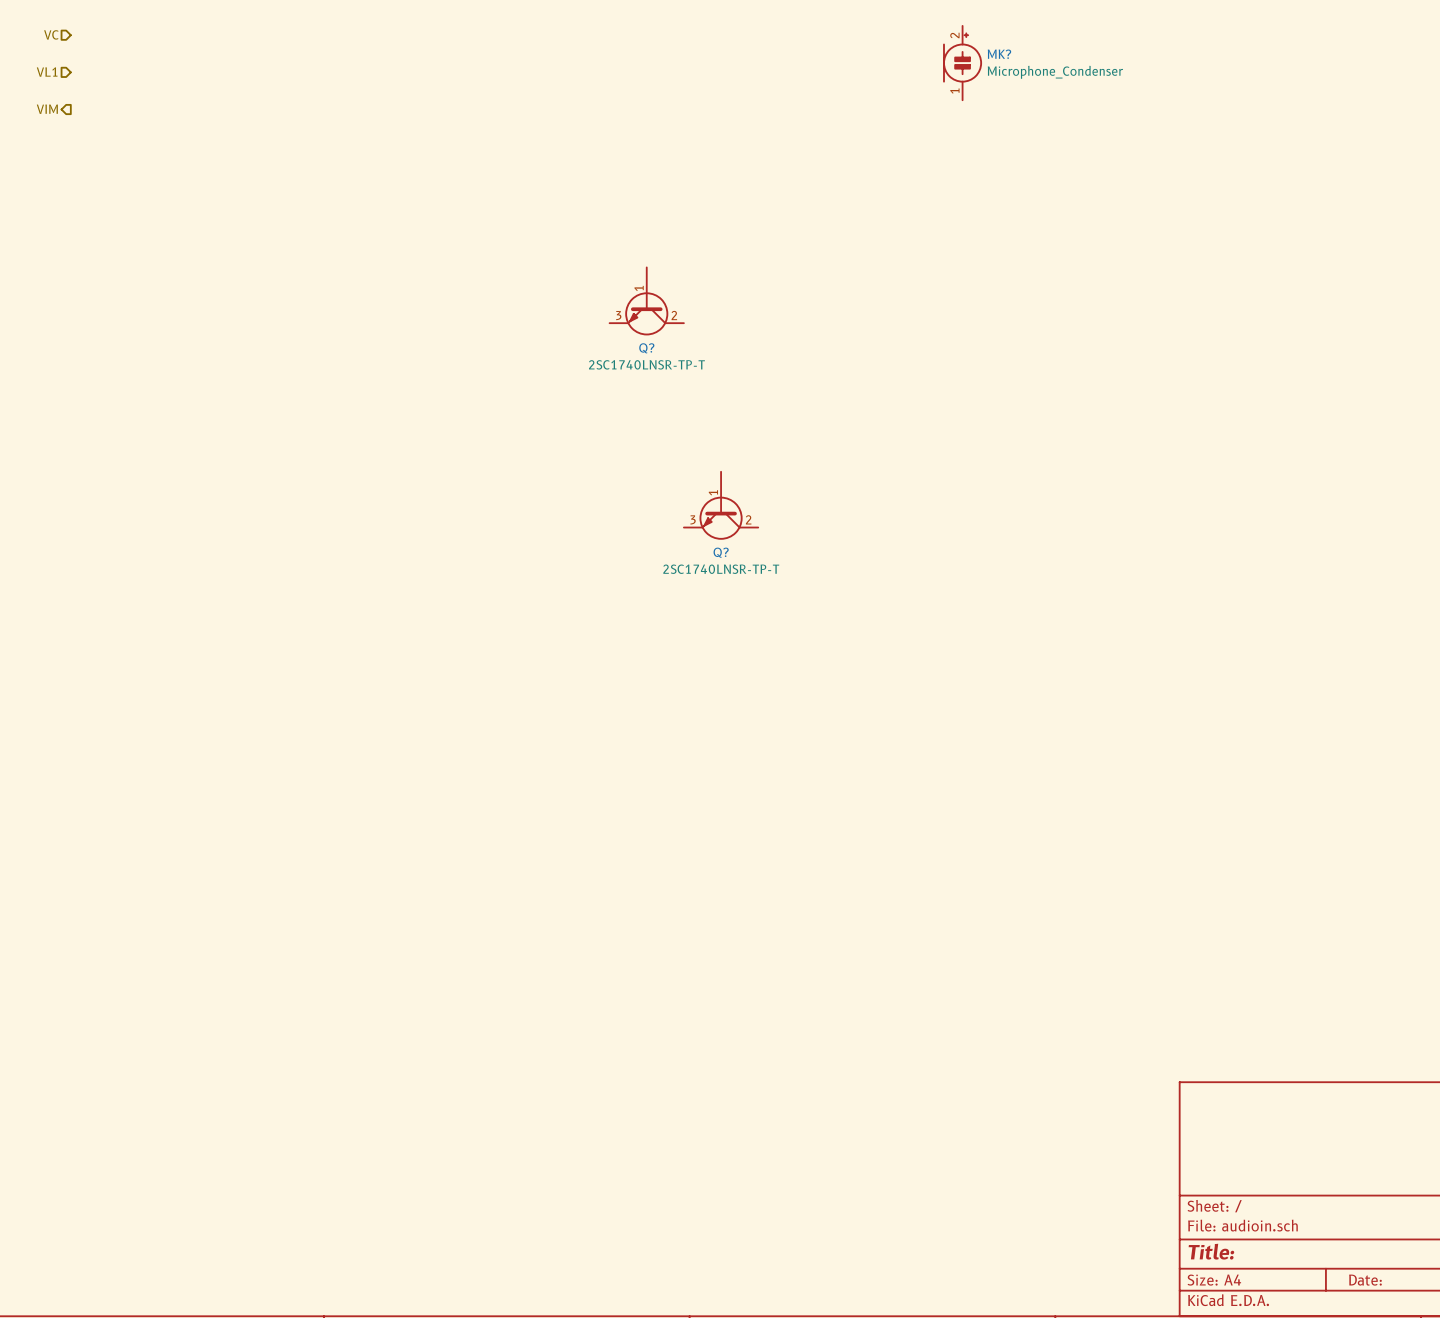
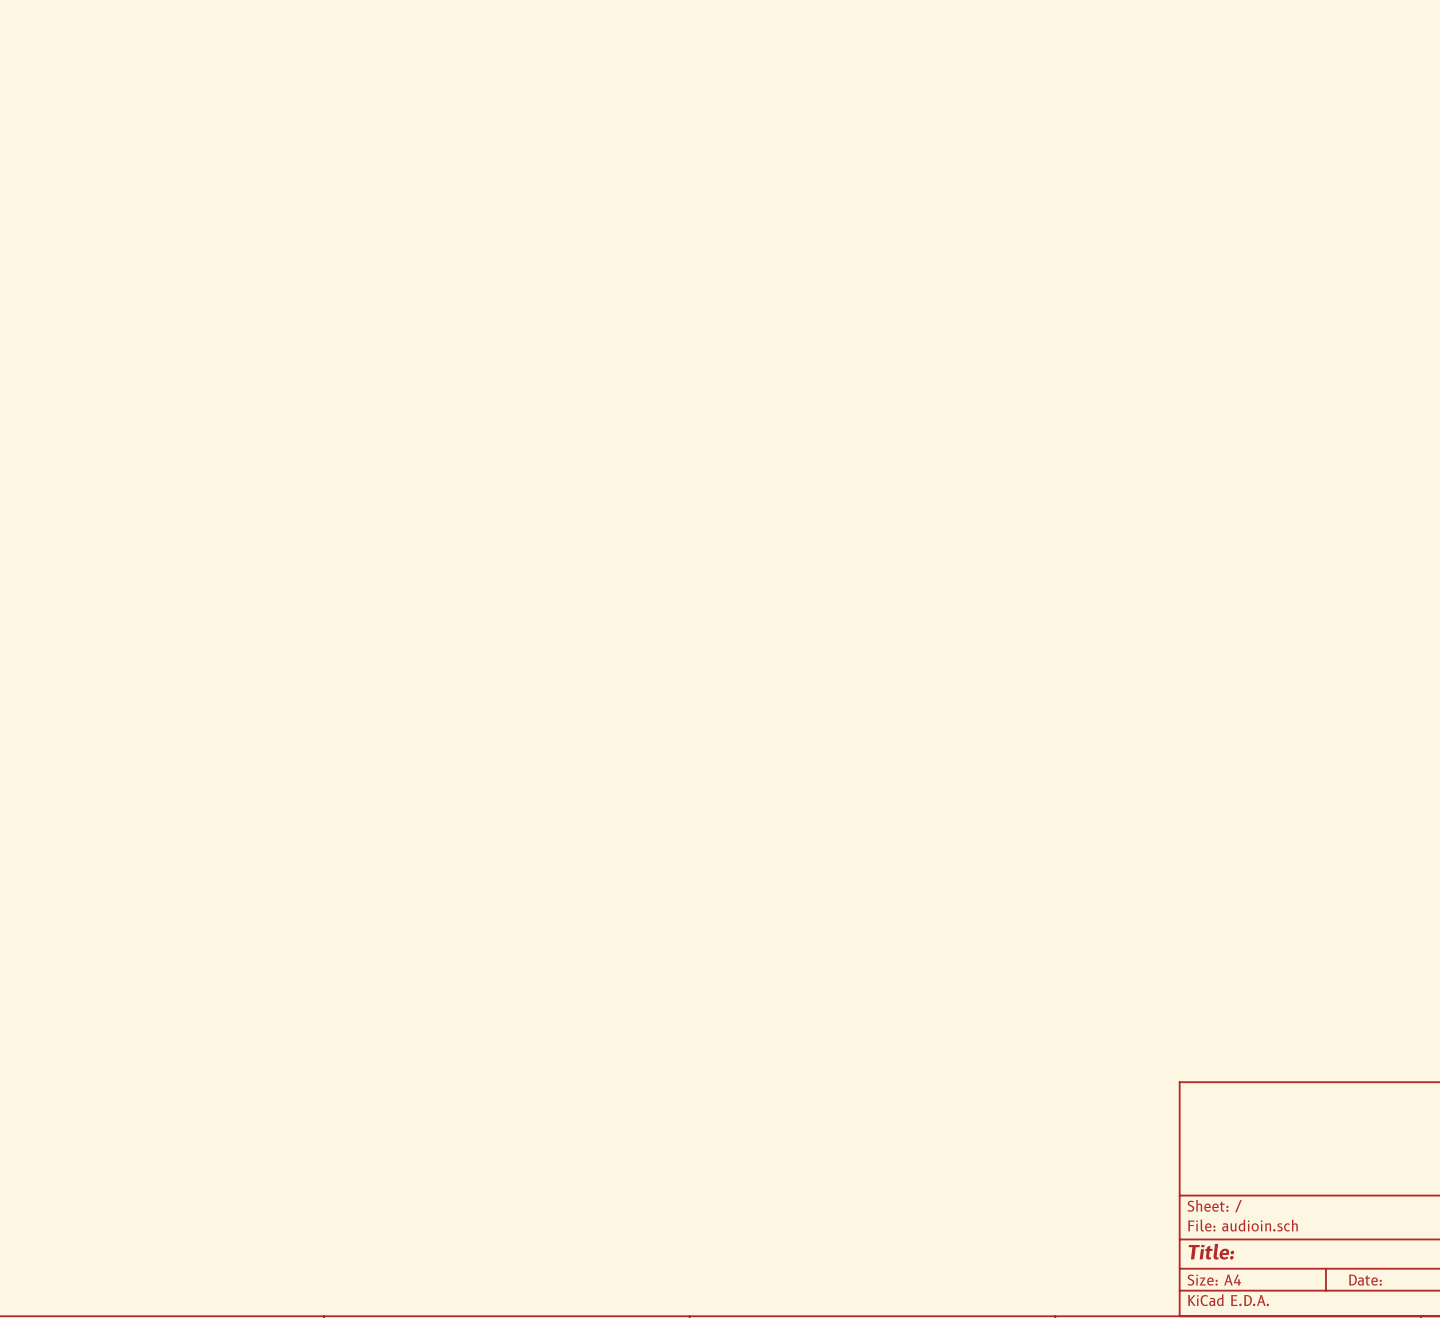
hierarchical label: VC (51, 34) -> none
MK?: Microphone_Condenser (962, 63) -> none
hierarchical label: VL1 (47, 72) -> none
hierarchical label: VIM (47, 109) -> none
Q?: 2SC1740LNSR-TP-T (646, 301) -> none
Q?: 2SC1740LNSR-TP-T (721, 505) -> none

